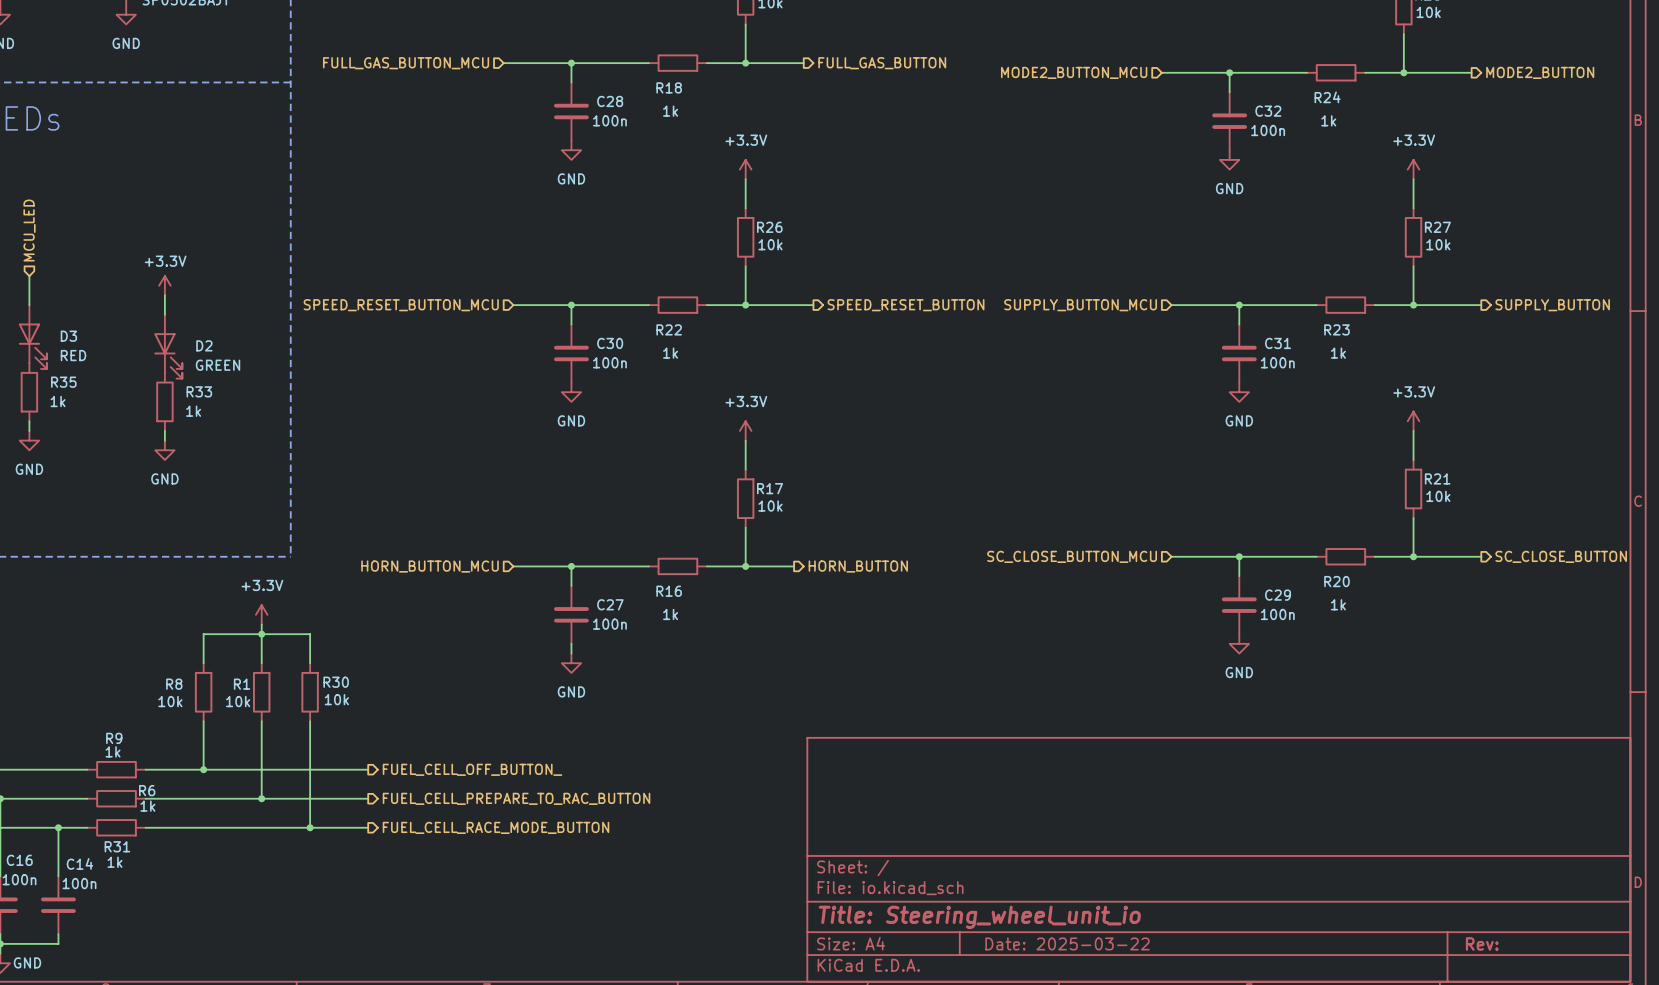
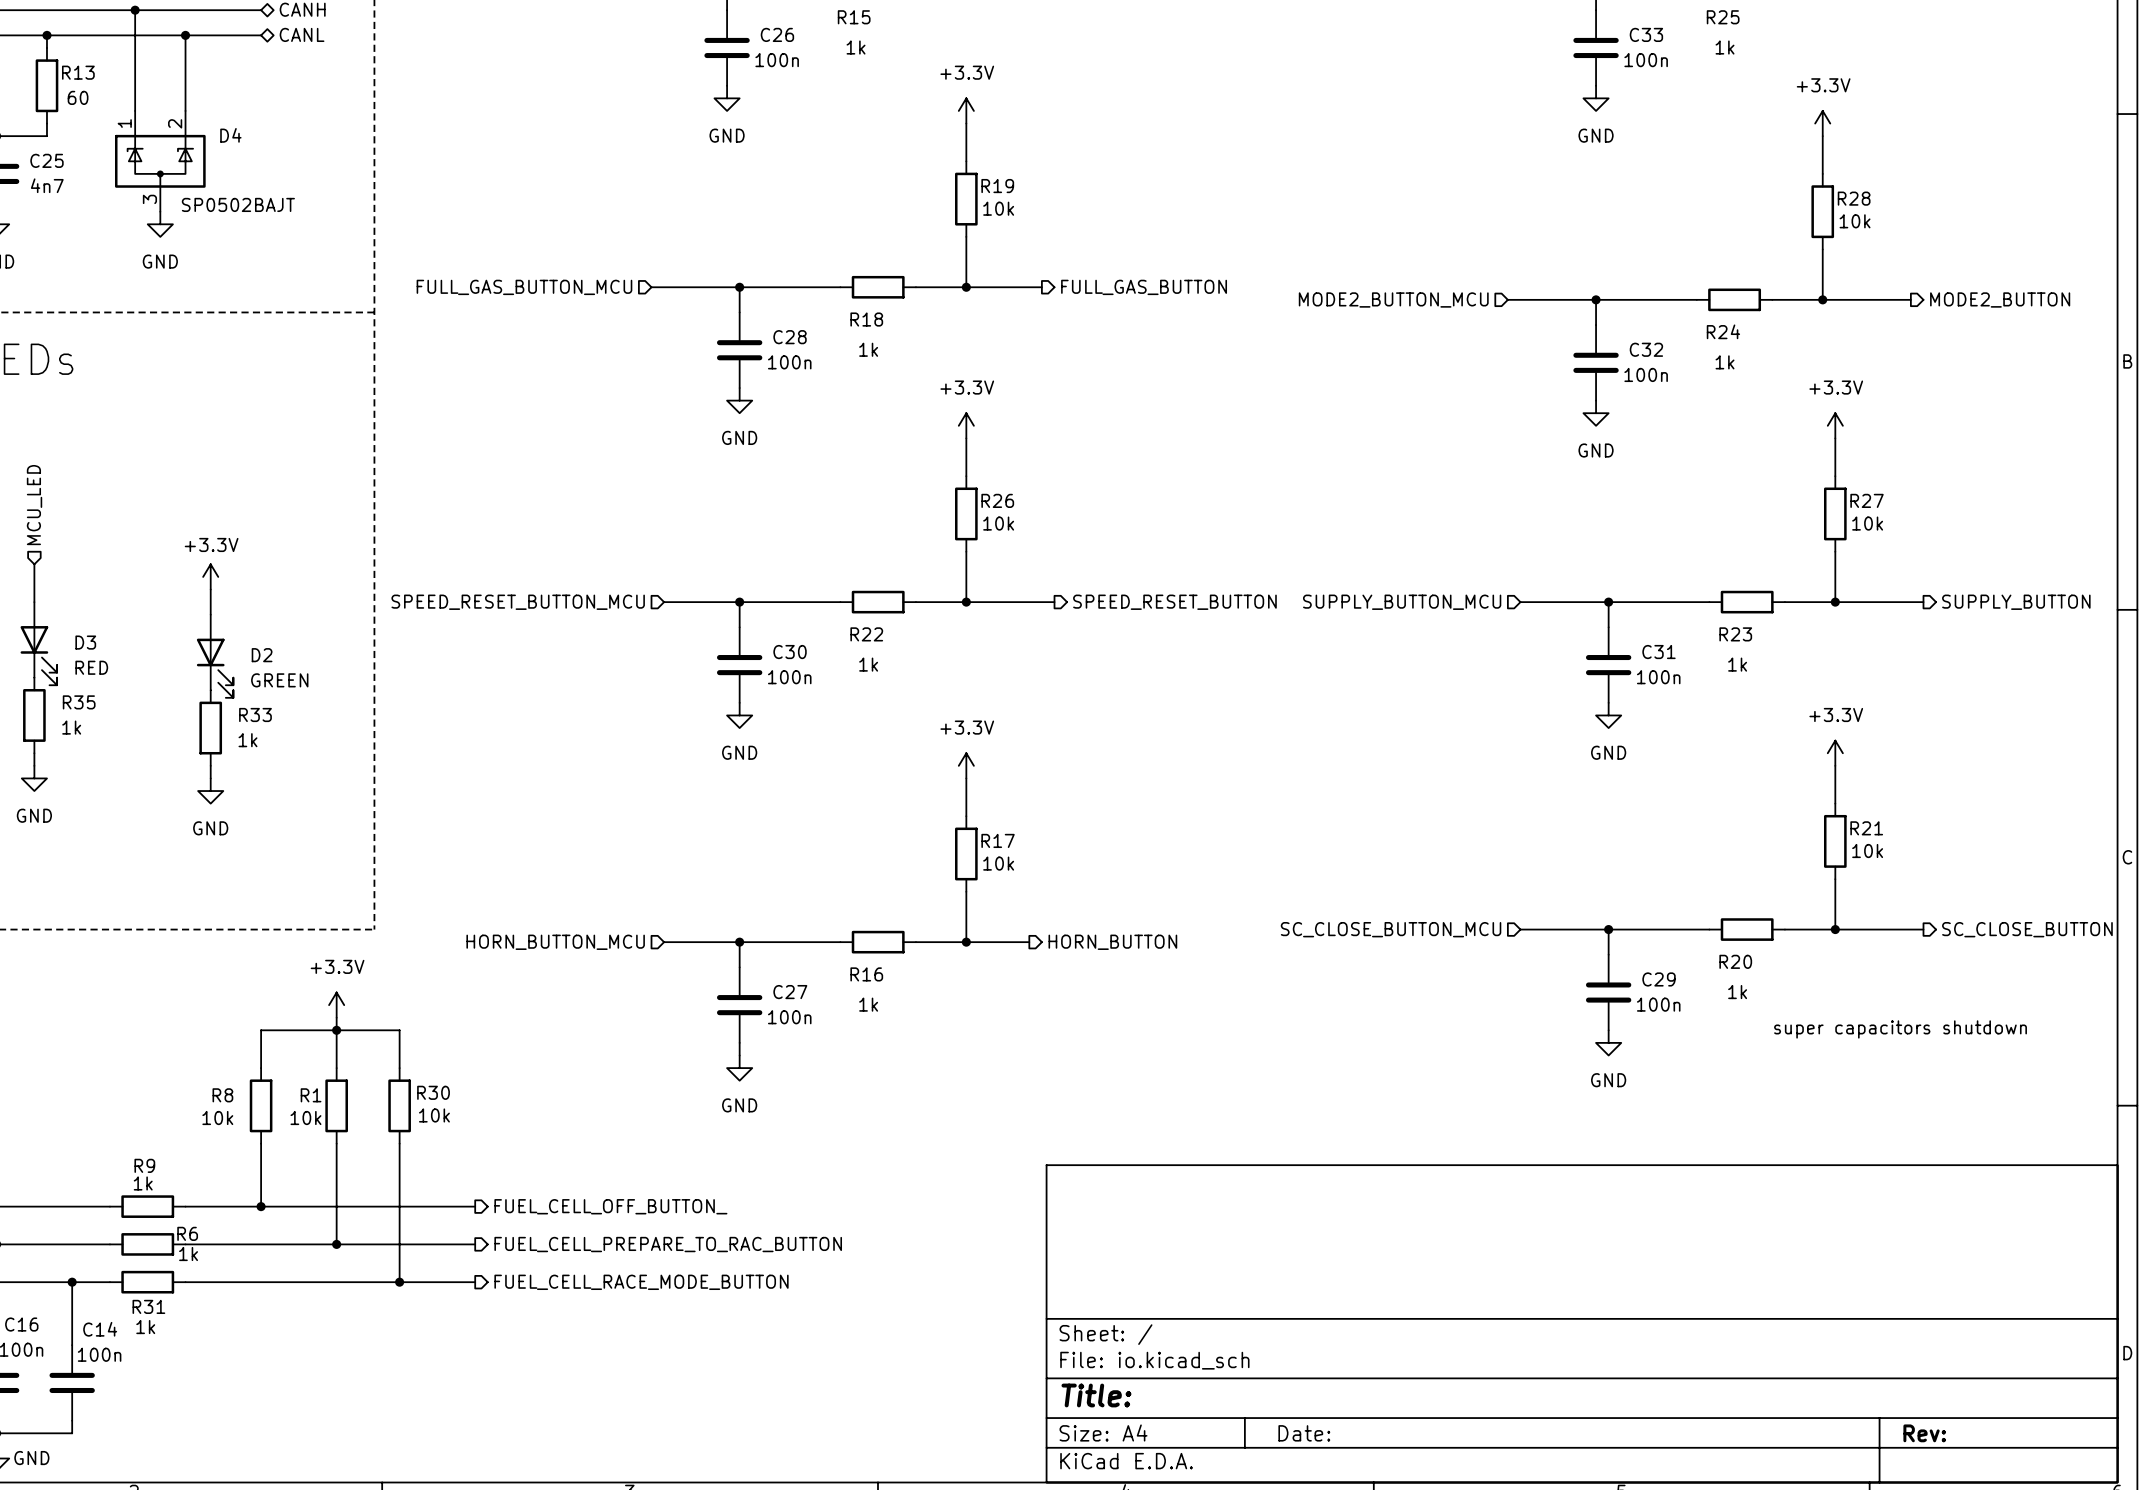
text: none -> super capacitors shutdown (1900, 1029)
title block: Title: Steering_wheel_unit_io (979, 917) -> Title: (1096, 1395)
title block: Date: 2025-03-22 (1067, 943) -> Date: (1304, 1433)

